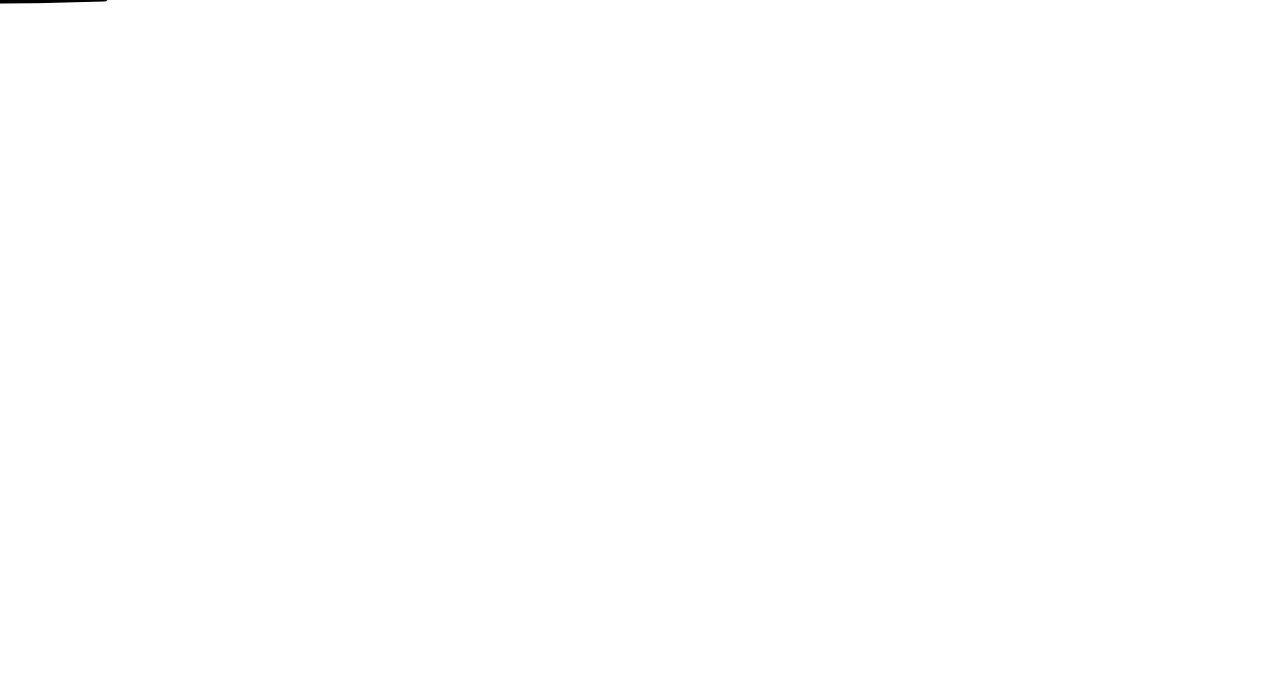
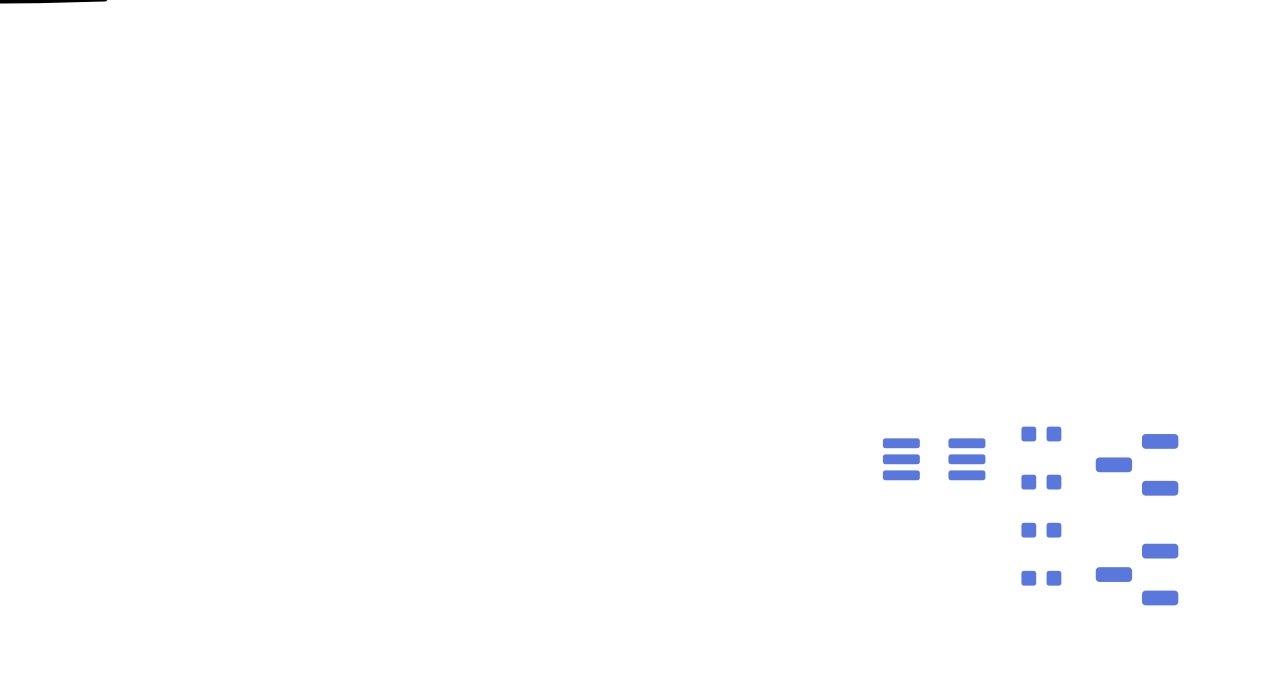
part: none -> (1041, 434)
part: none -> (934, 459)
part: none -> (1137, 464)
part: none -> (1041, 482)
part: none -> (1041, 530)
part: none -> (1137, 574)
part: none -> (1041, 578)

